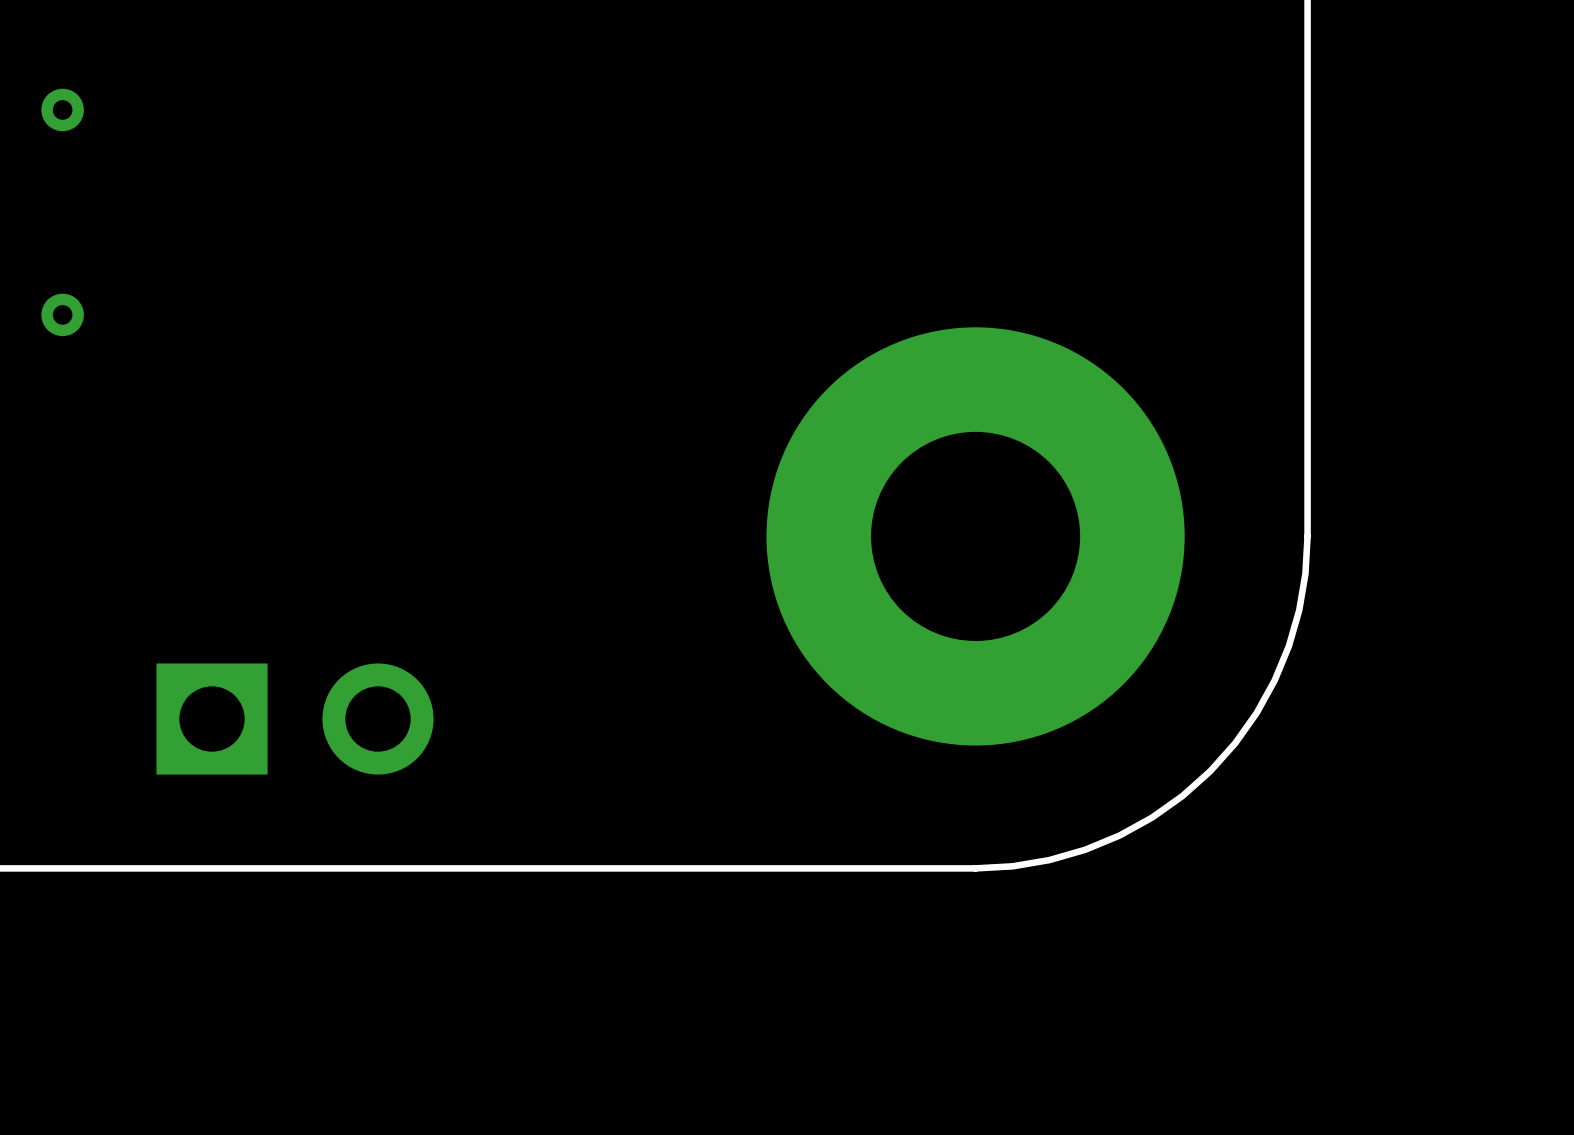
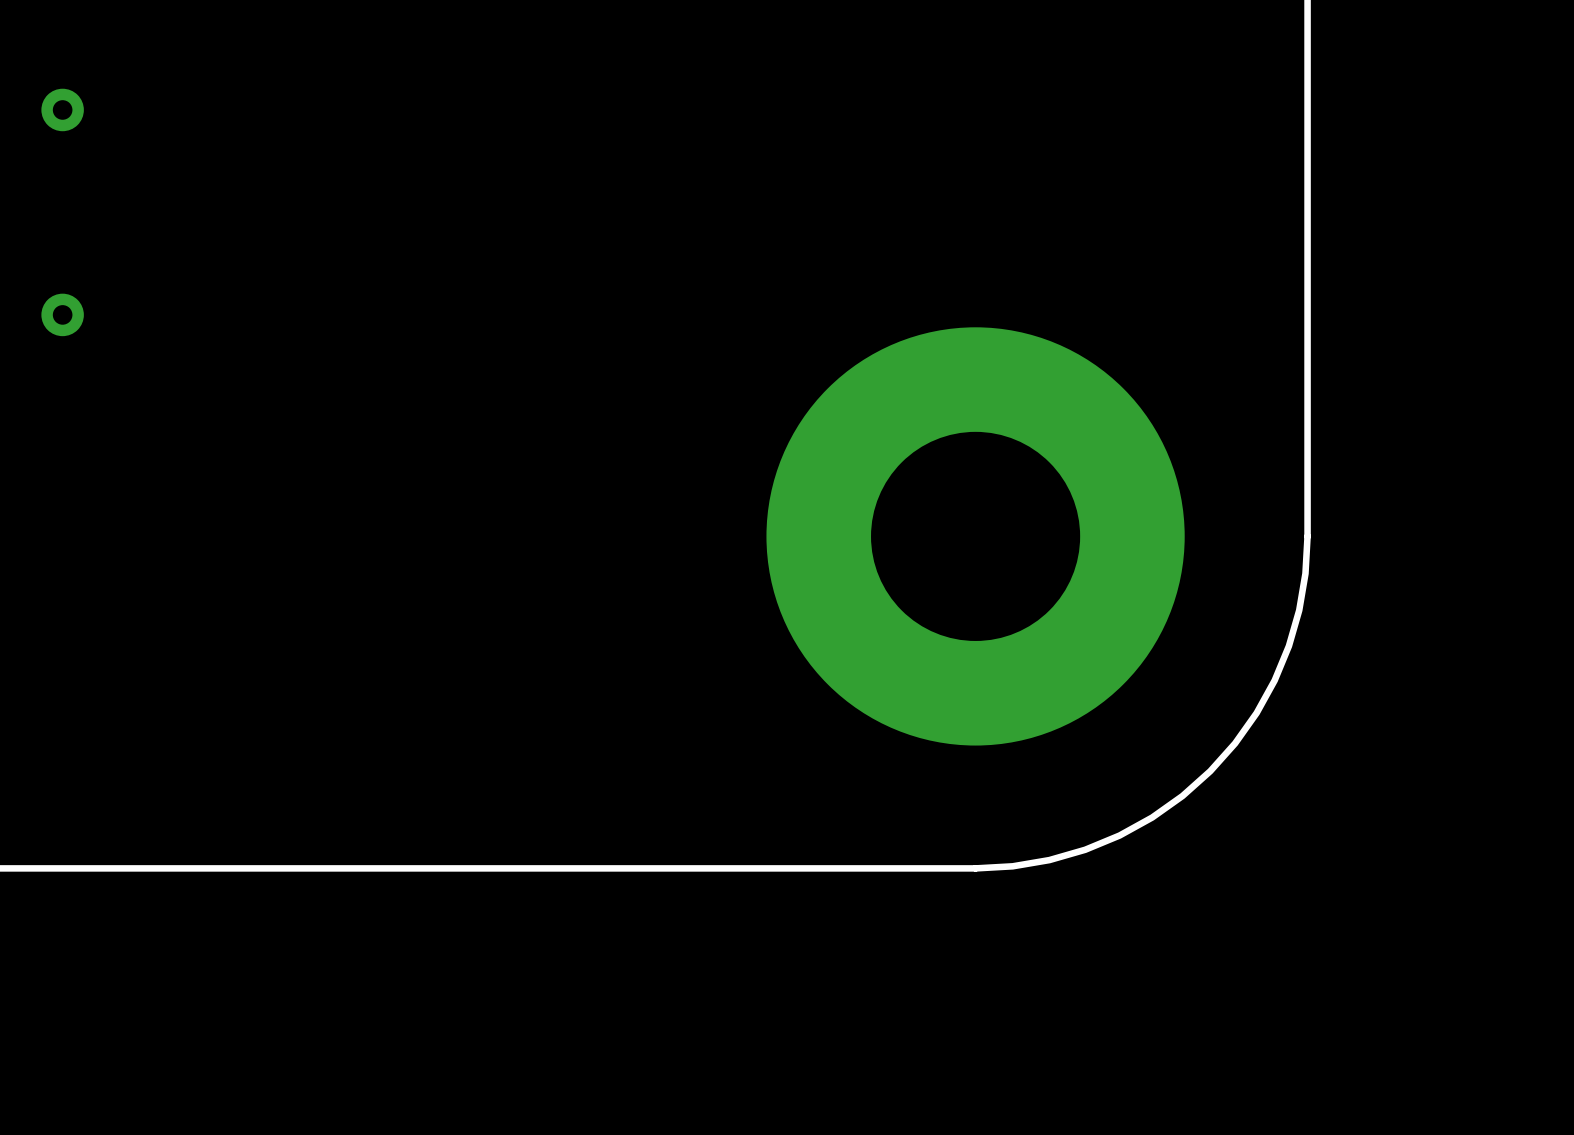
part: (295, 719) -> none

